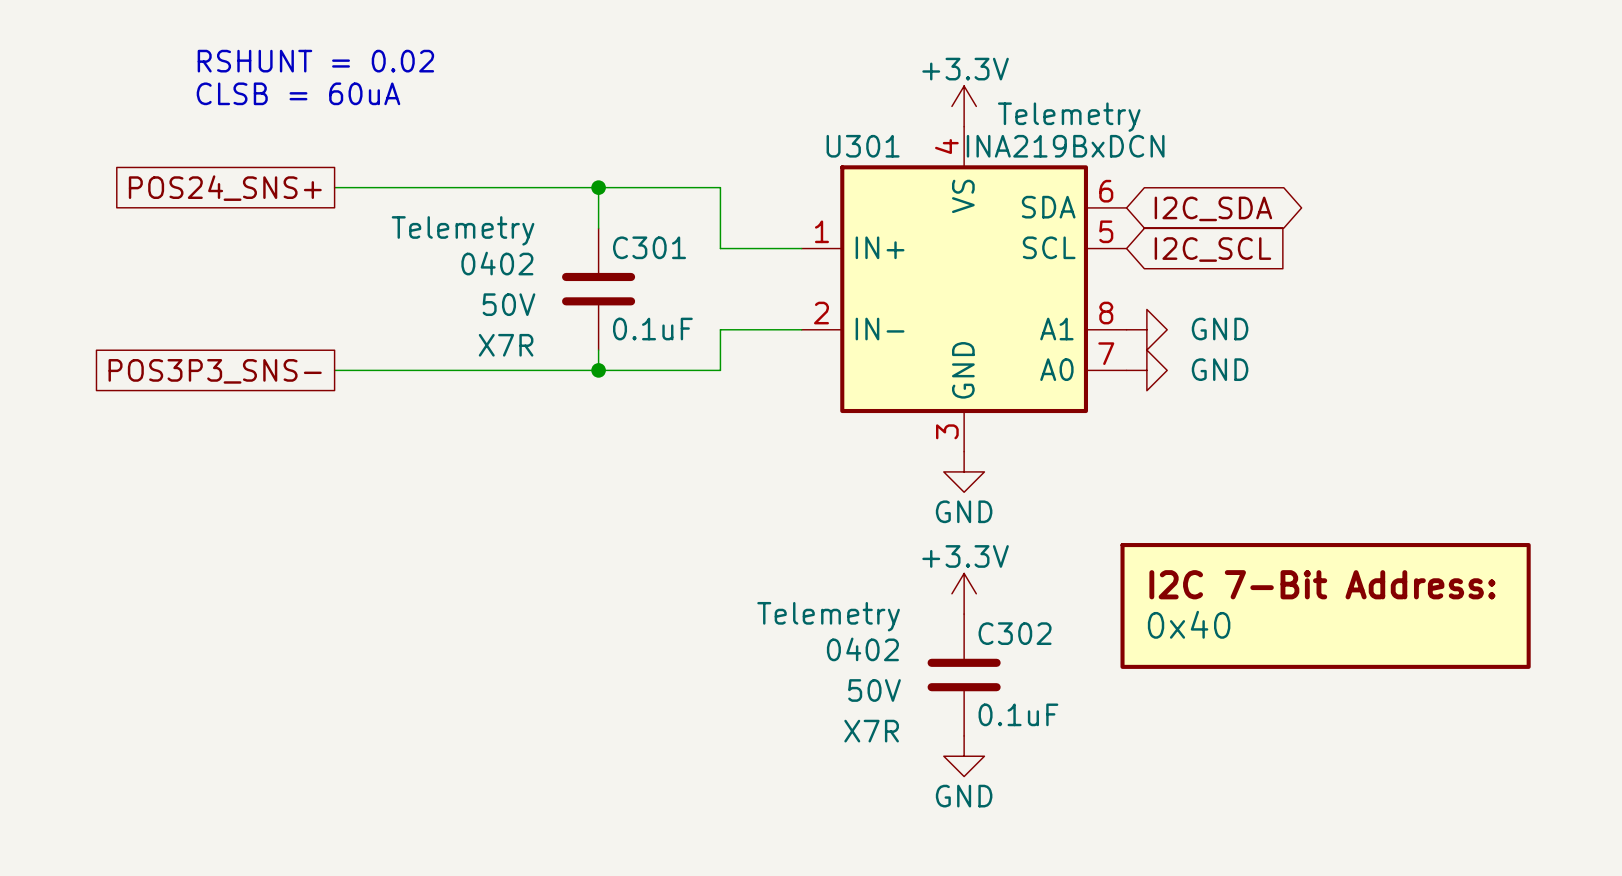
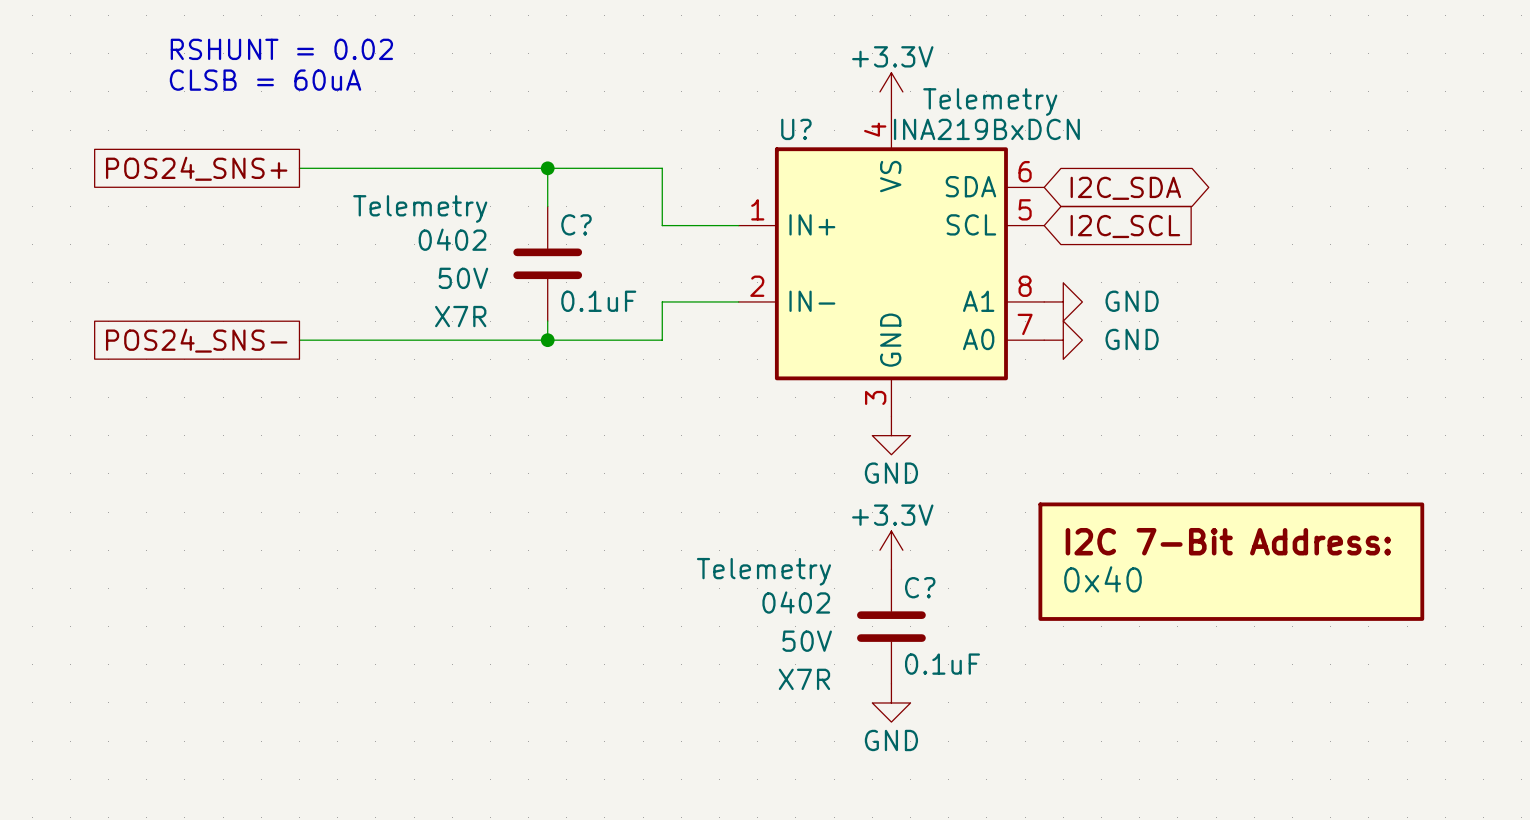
U301 name: U301 (863, 146) -> U? (796, 129)
C301 name: C301 (649, 247) -> C? (576, 224)
global label: POS3P3_SNS- (215, 371) -> POS24_SNS- (196, 340)
C302 name: C302 (1015, 633) -> C? (920, 587)

